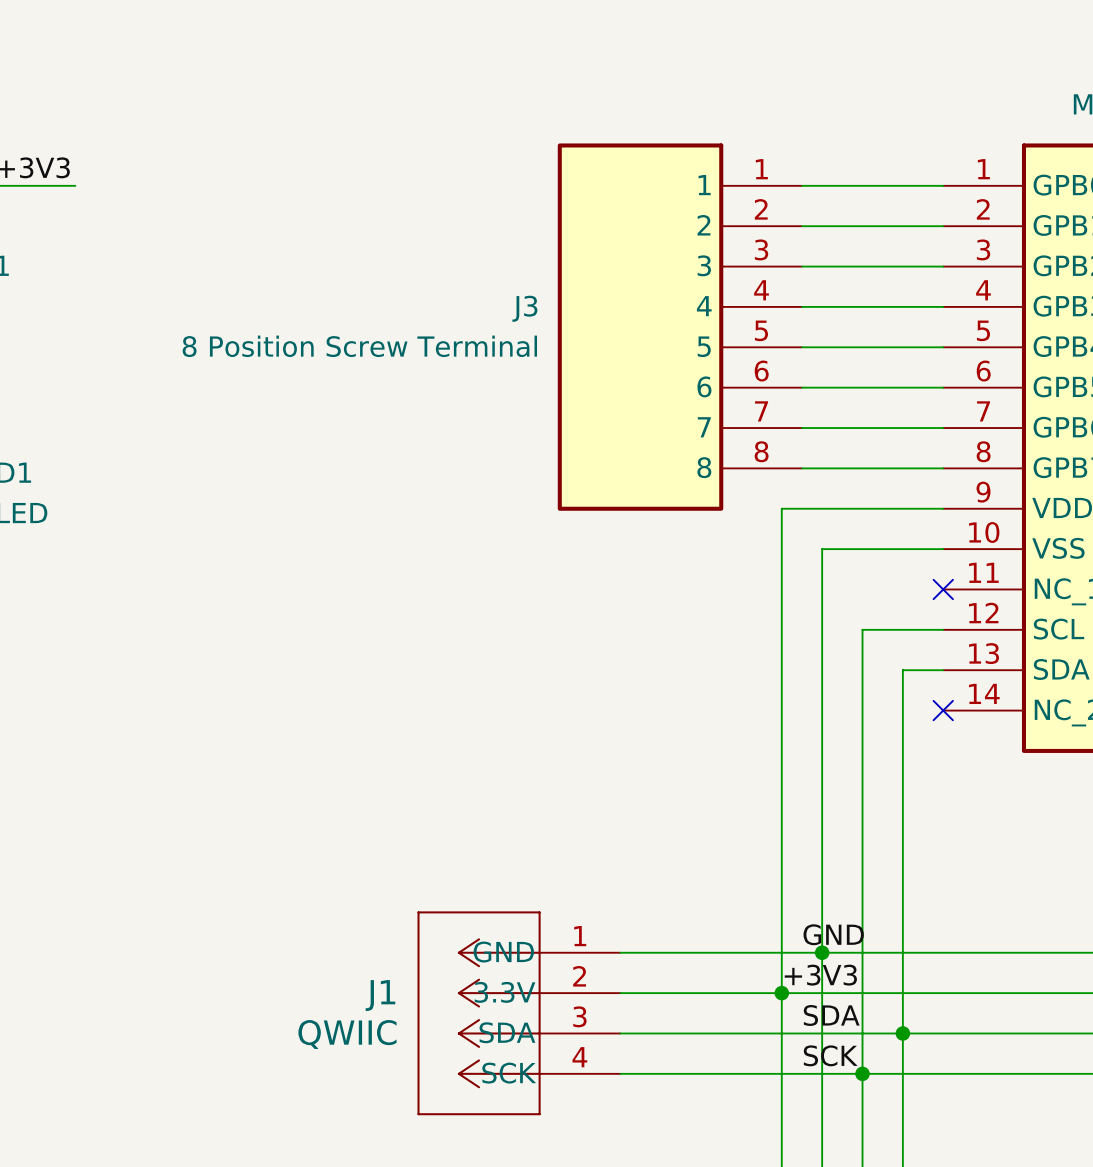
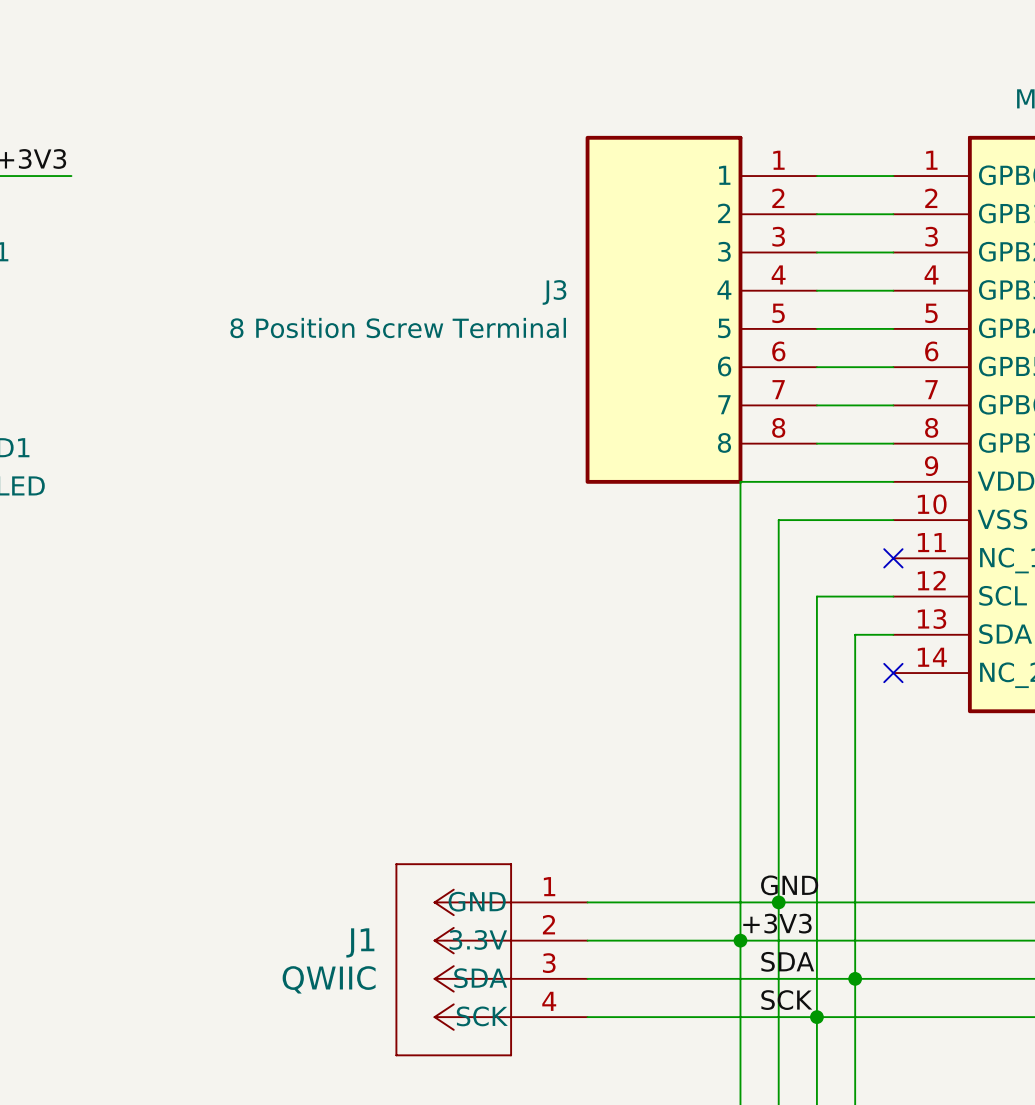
J3 position: (679, 327) -> (701, 309)

